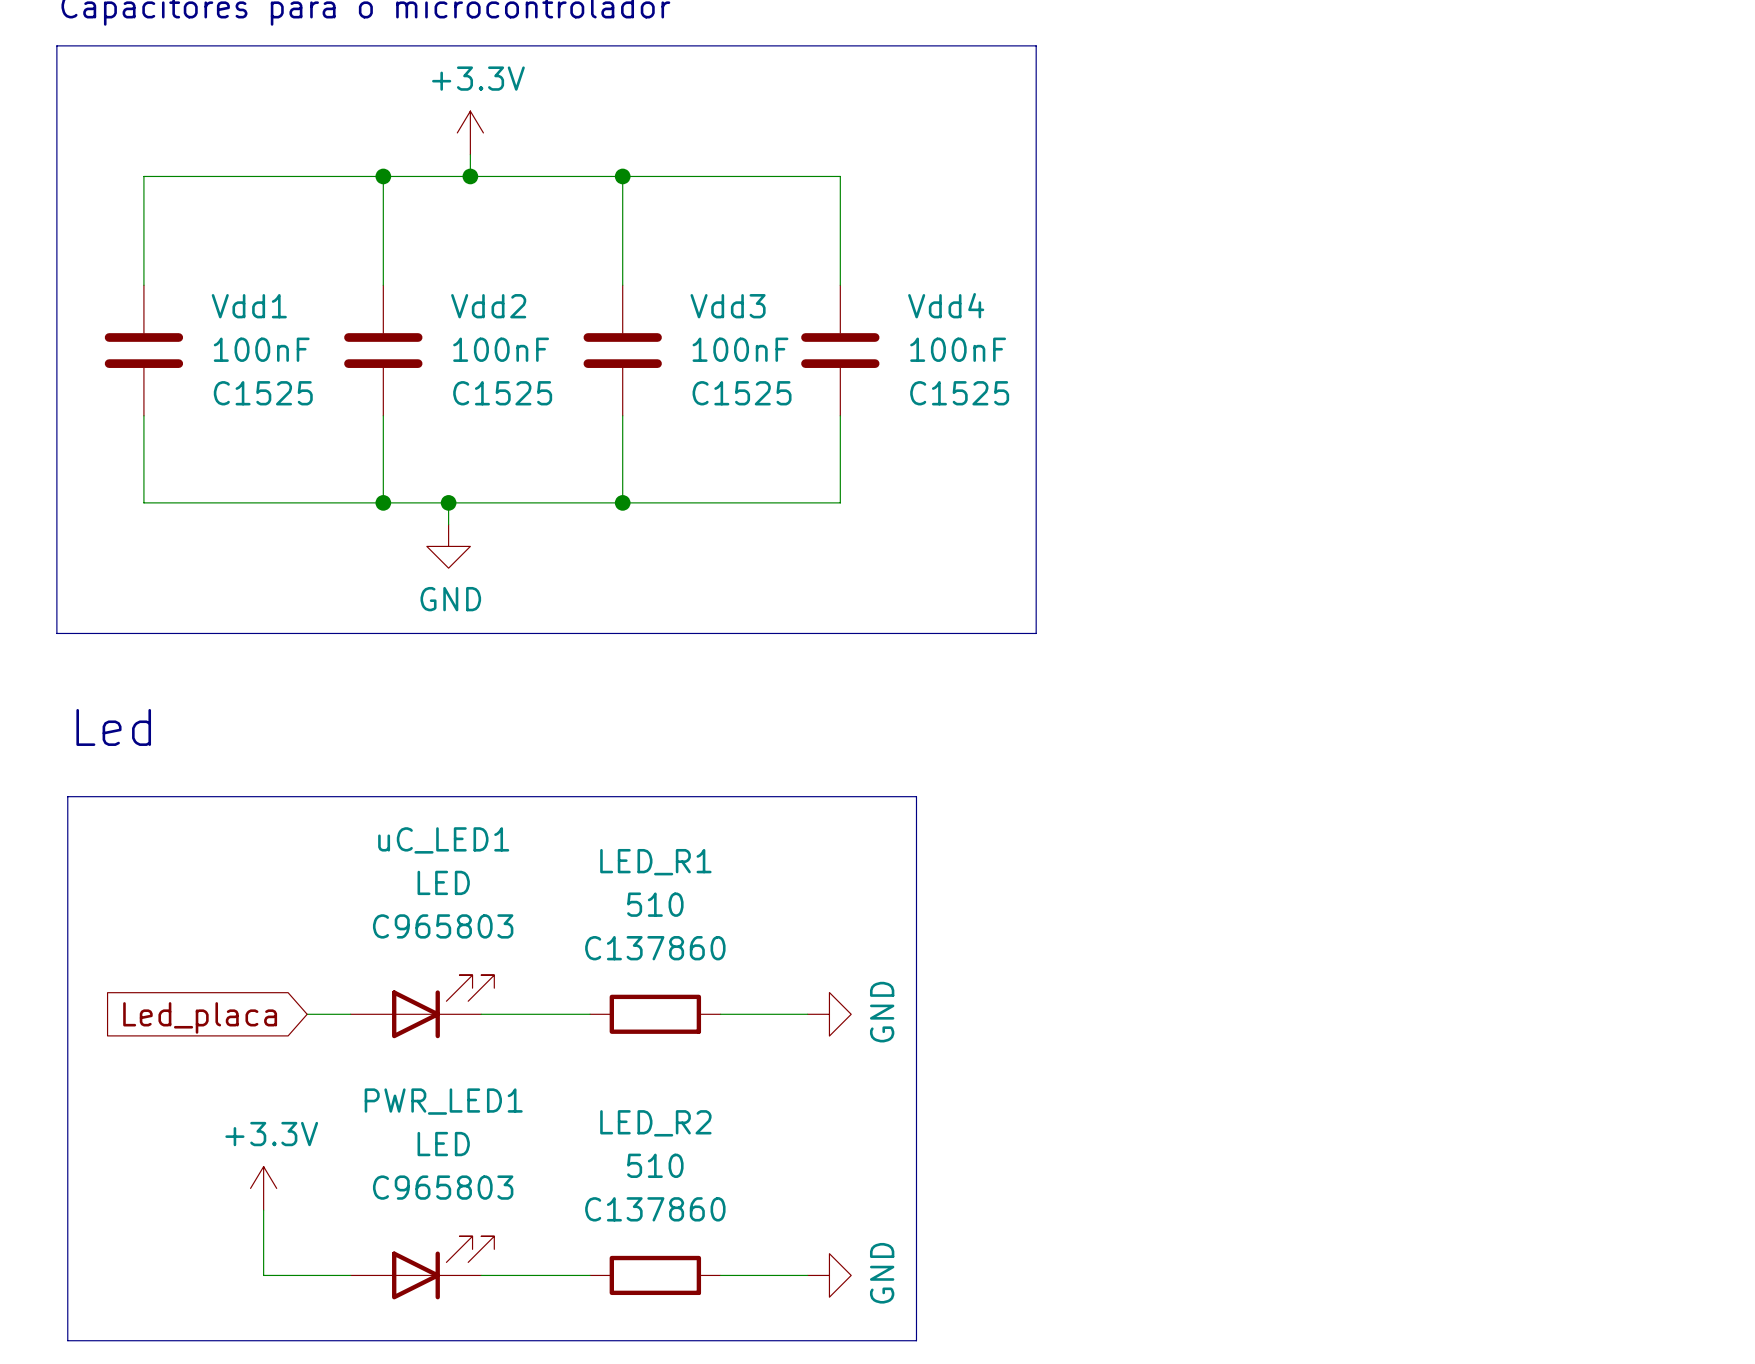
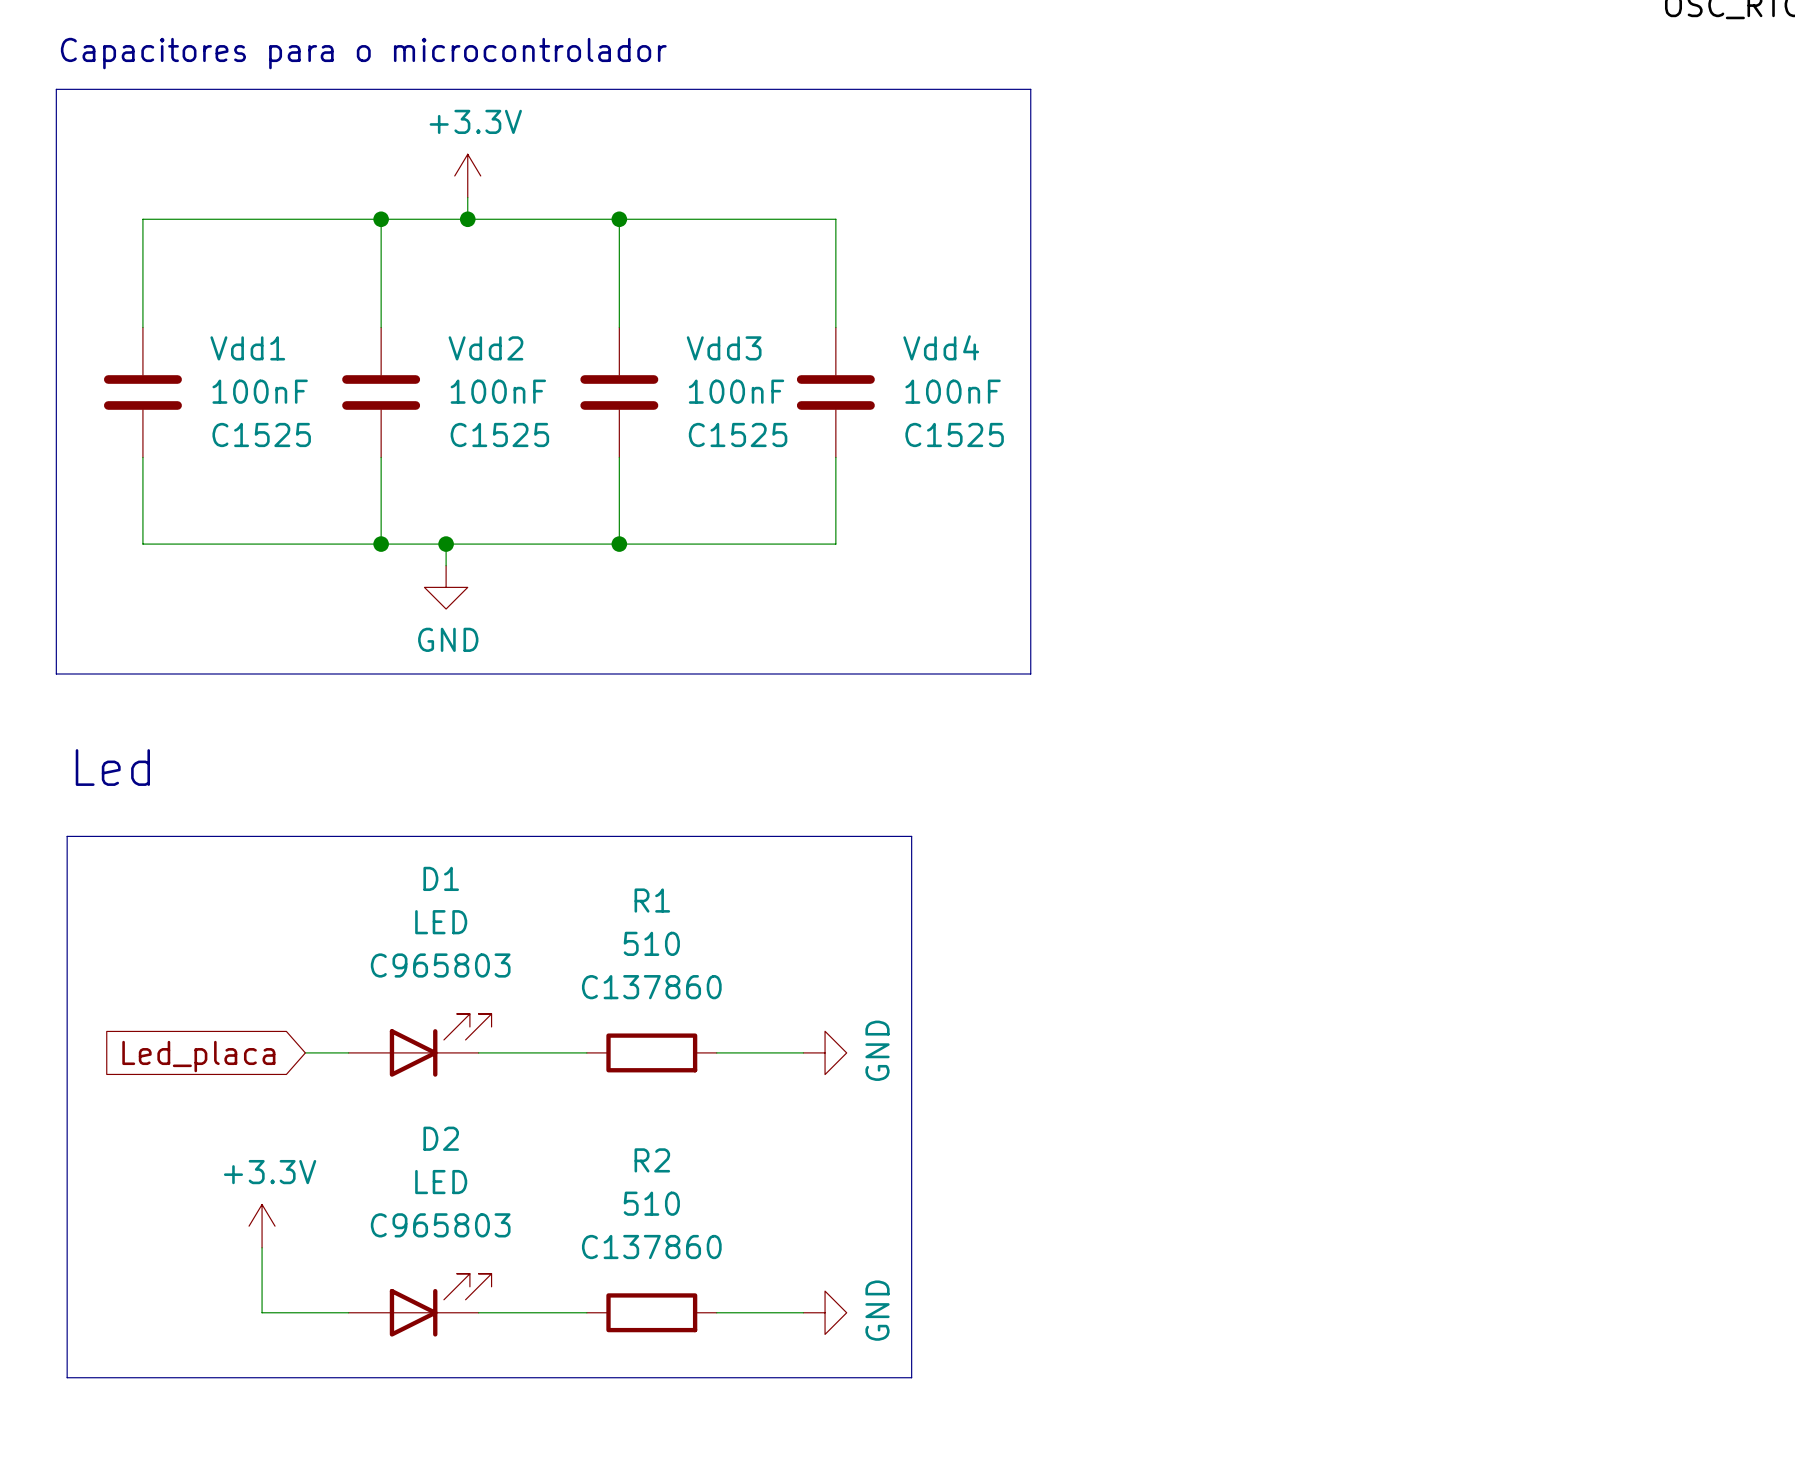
uC_LED1 name: uC_LED1 (443, 840) -> D1 (441, 878)
LED_R1 name: LED_R1 (655, 862) -> R1 (652, 900)
PWR_LED1 name: PWR_LED1 (443, 1101) -> D2 (441, 1138)
LED_R2 name: LED_R2 (655, 1123) -> R2 (652, 1160)

